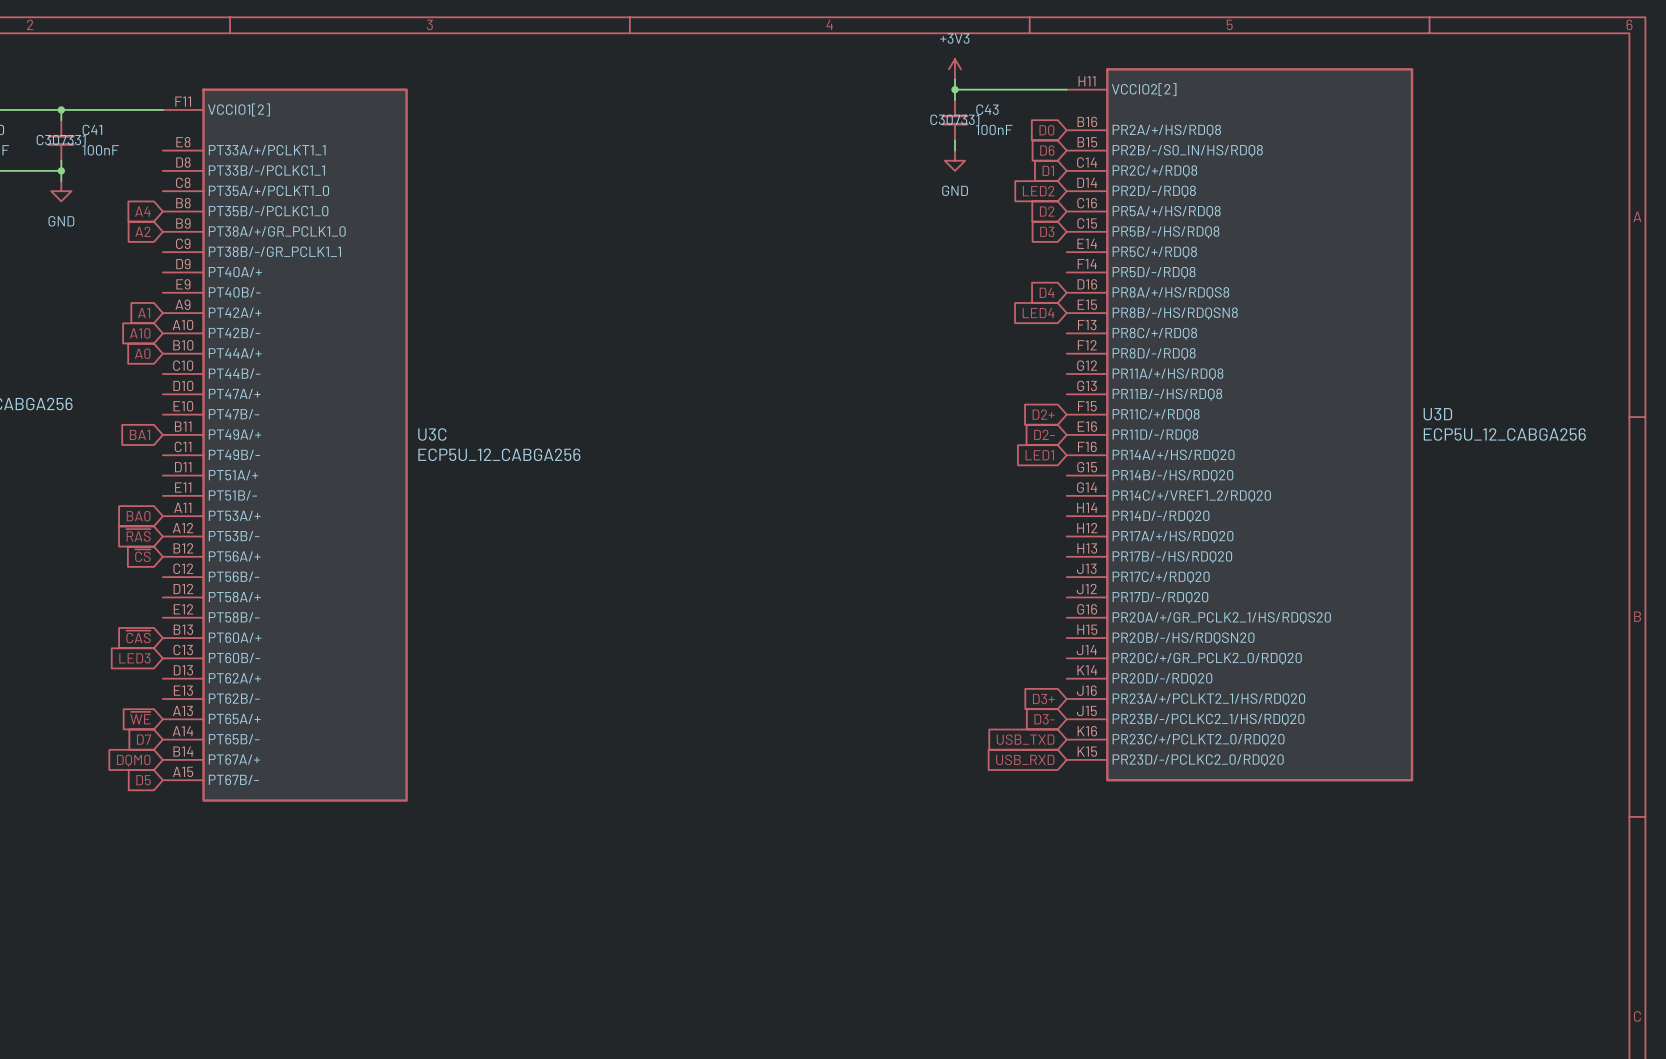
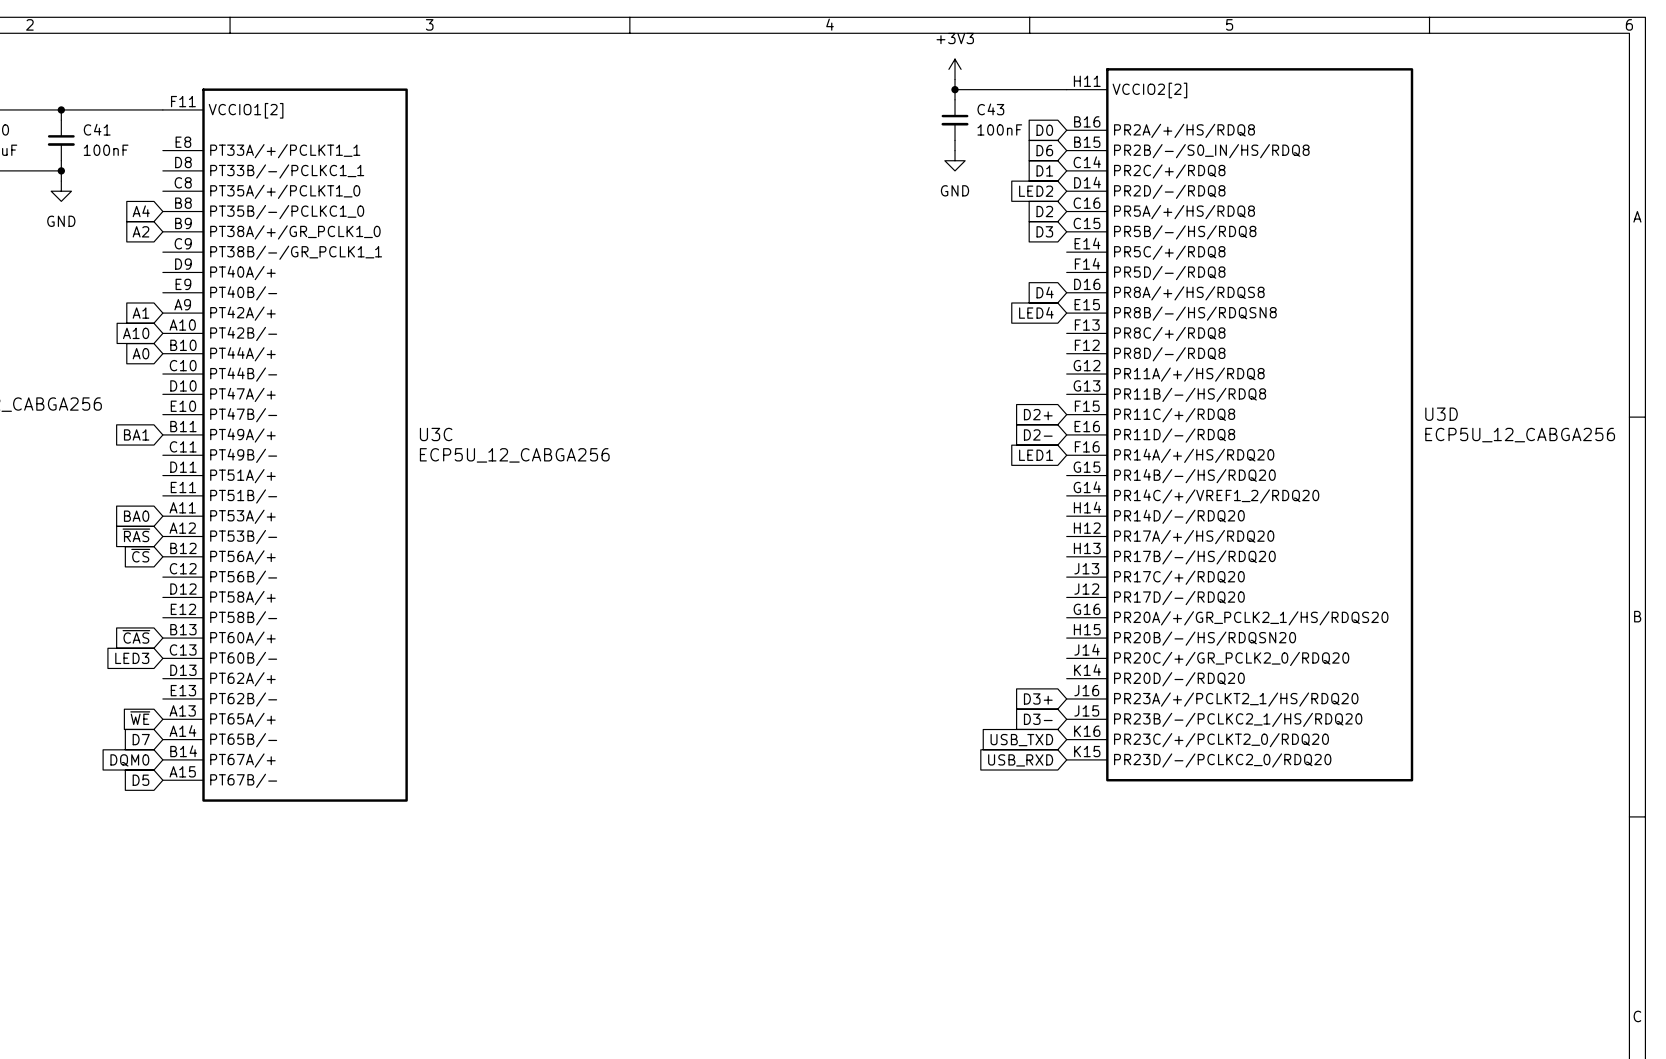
C43 text: C307331 (954, 119) -> none
C41 text: C307331 (61, 140) -> none

